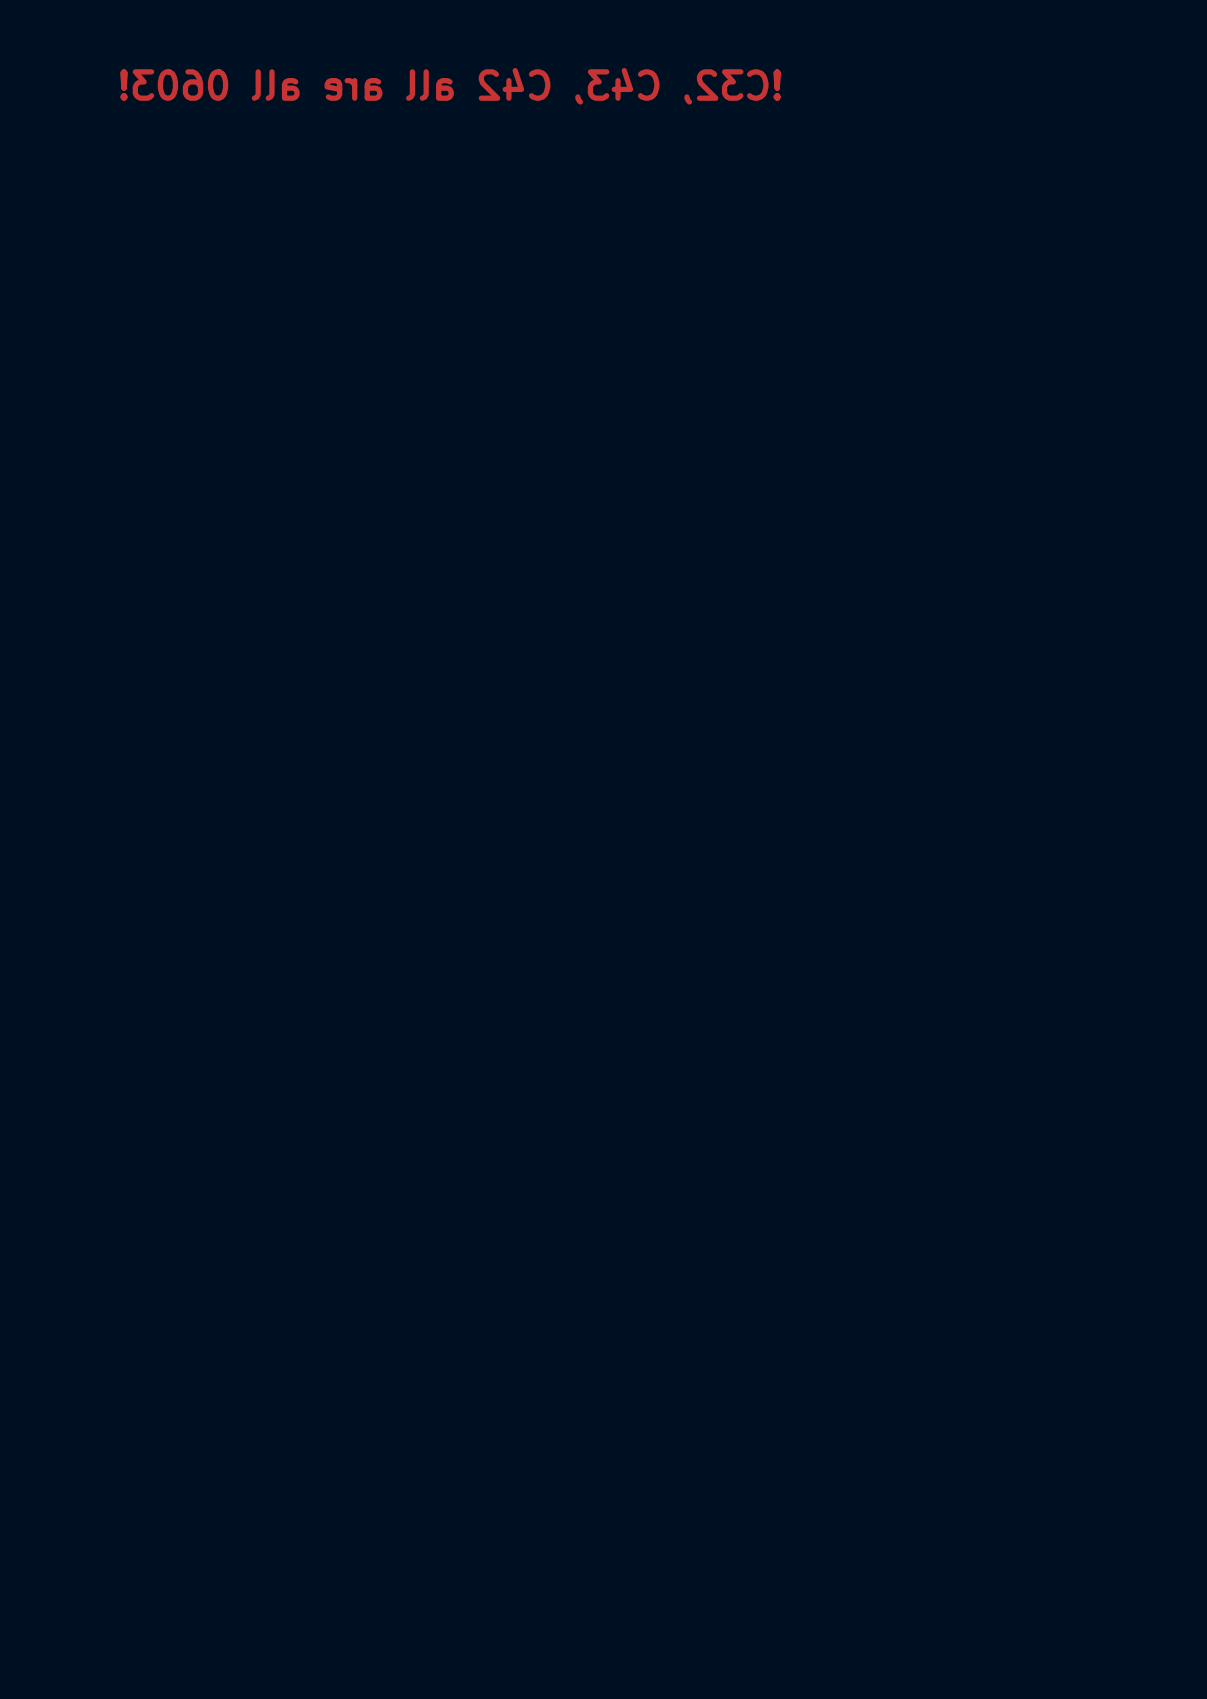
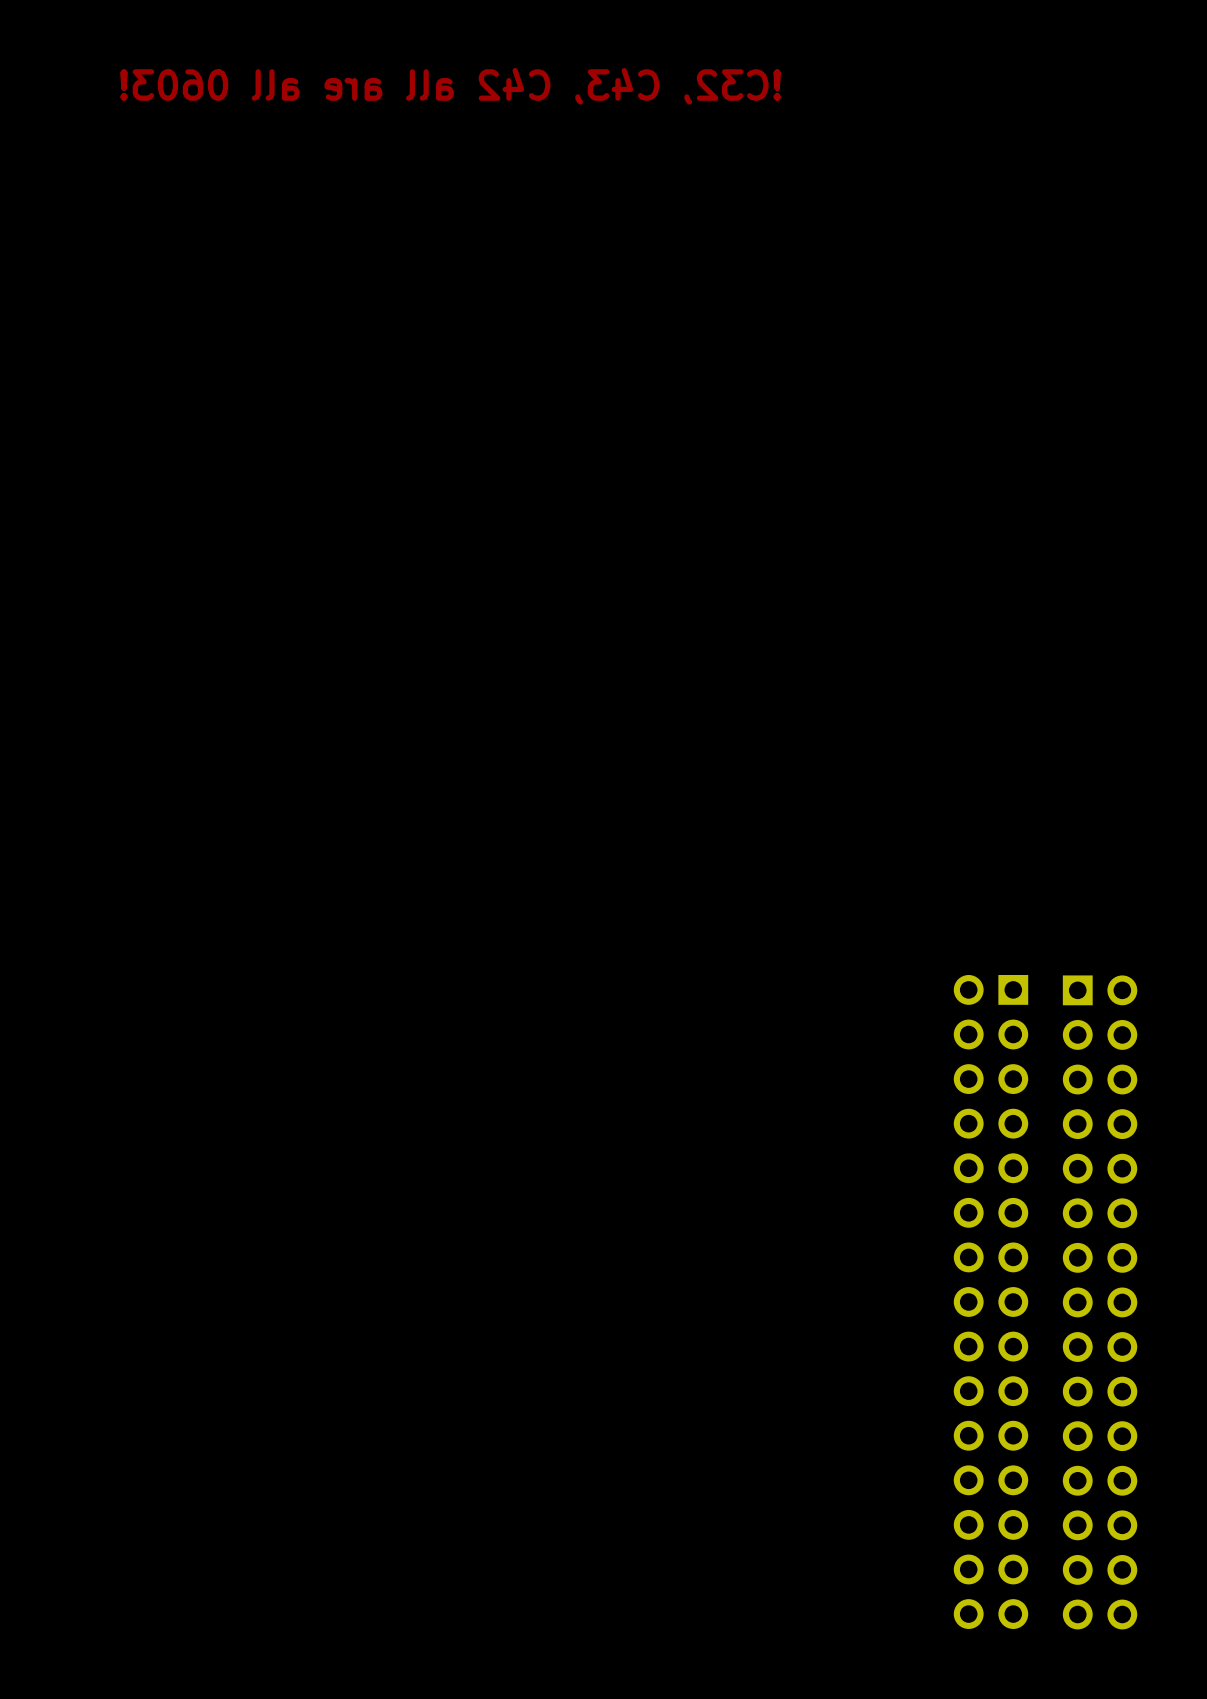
part: none -> (990, 1301)
part: none -> (1100, 1302)

